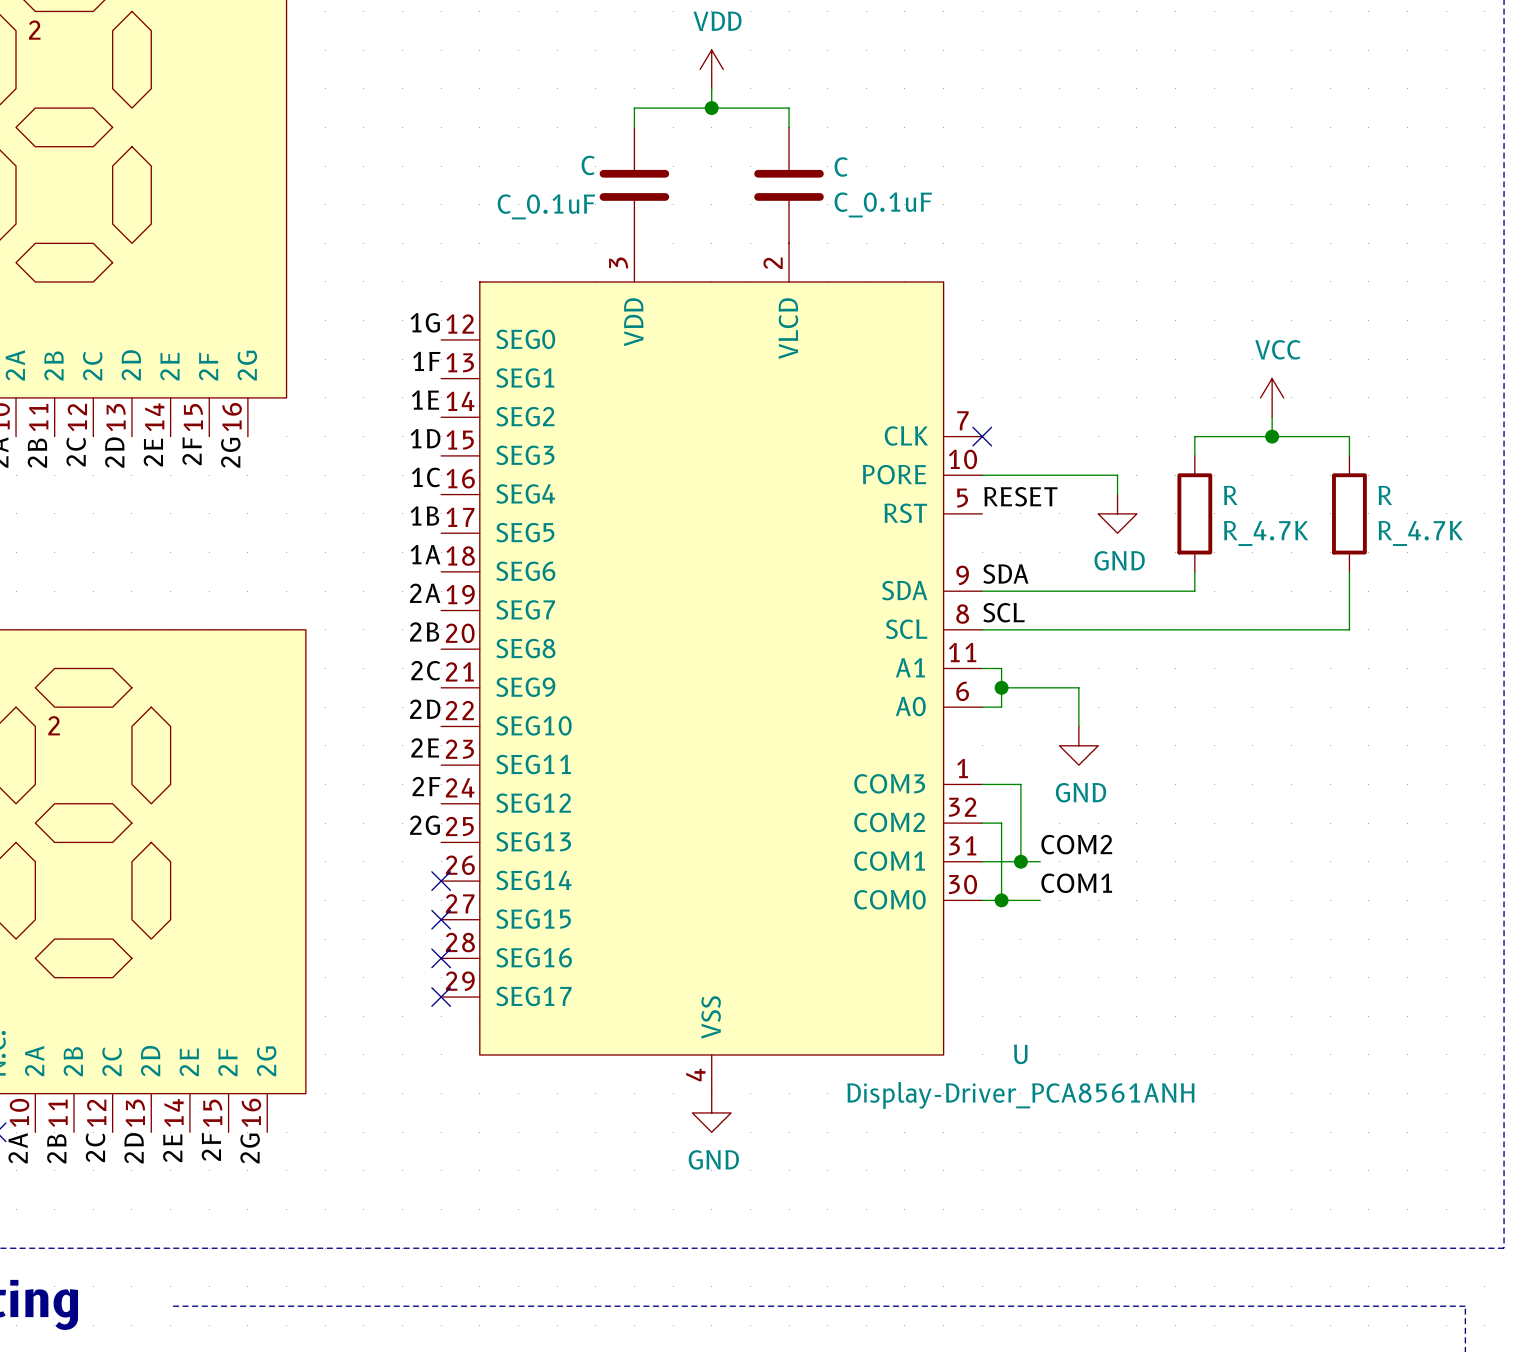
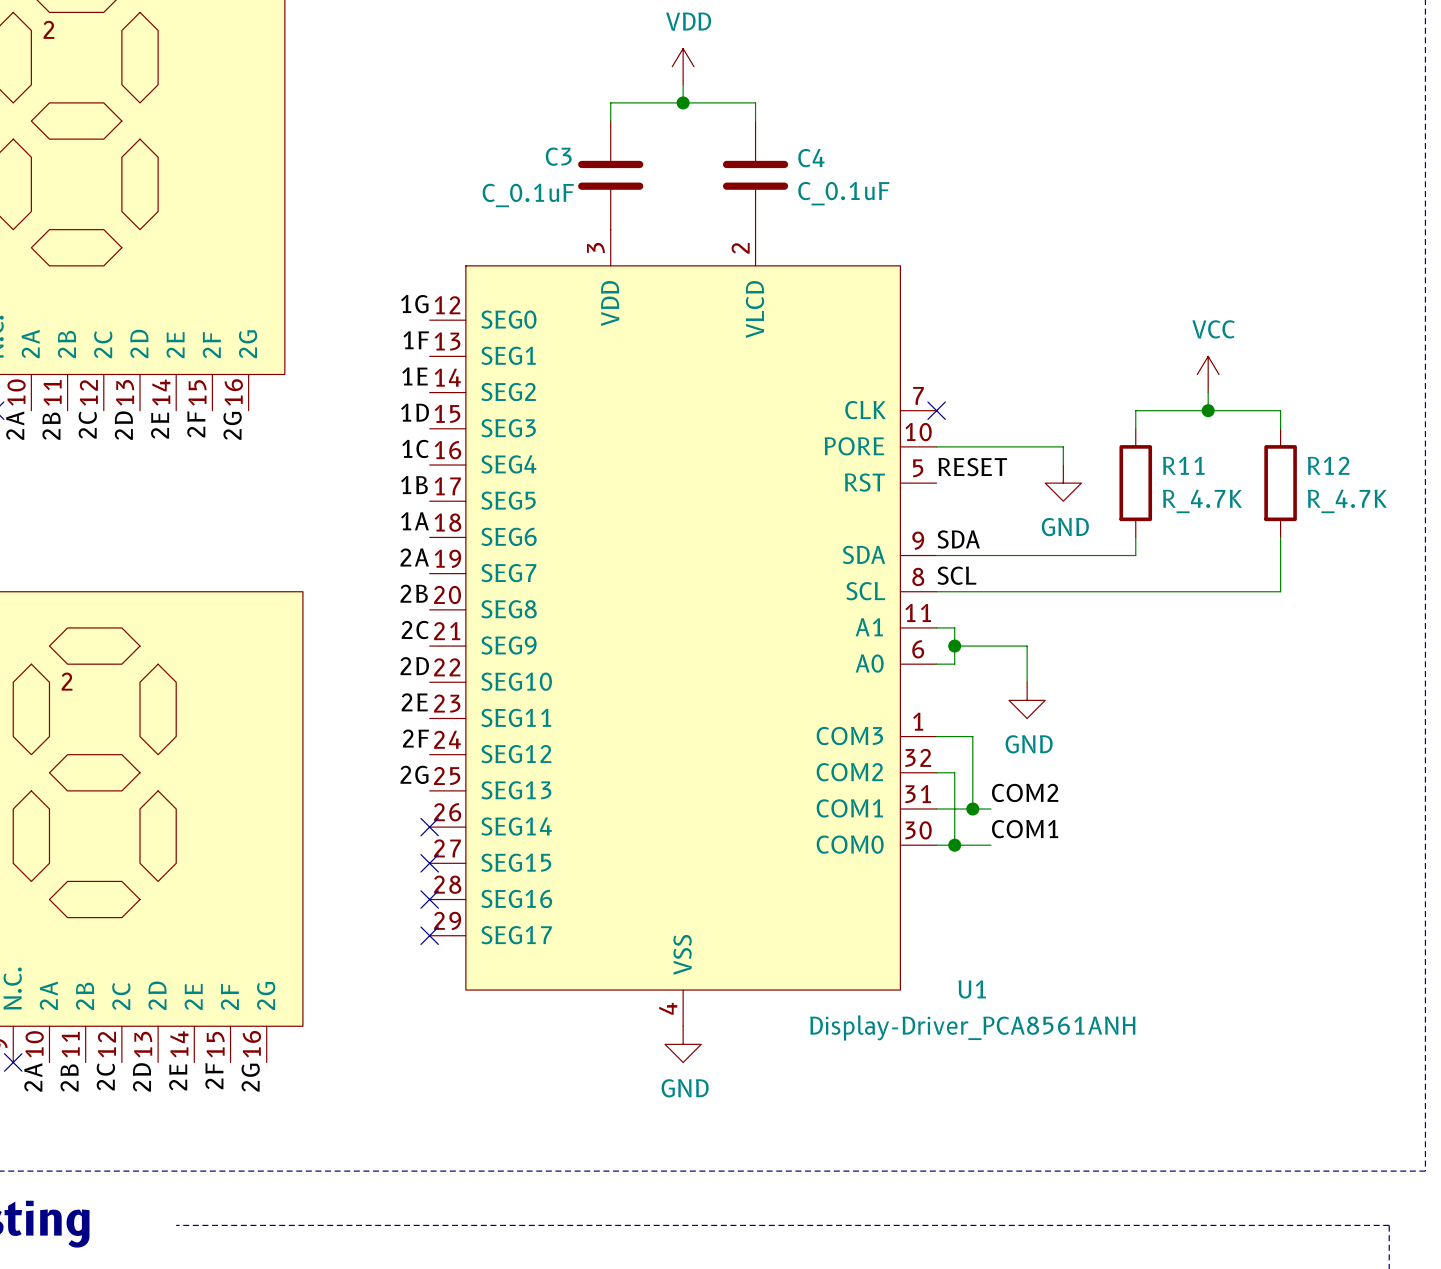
C name: C (588, 165) -> C3 (558, 156)
C name: C (841, 167) -> C4 (811, 158)
R name: R (1230, 495) -> R11 (1183, 465)
R name: R (1385, 495) -> R12 (1328, 465)
U name: U (1020, 1054) -> U1 (972, 989)

